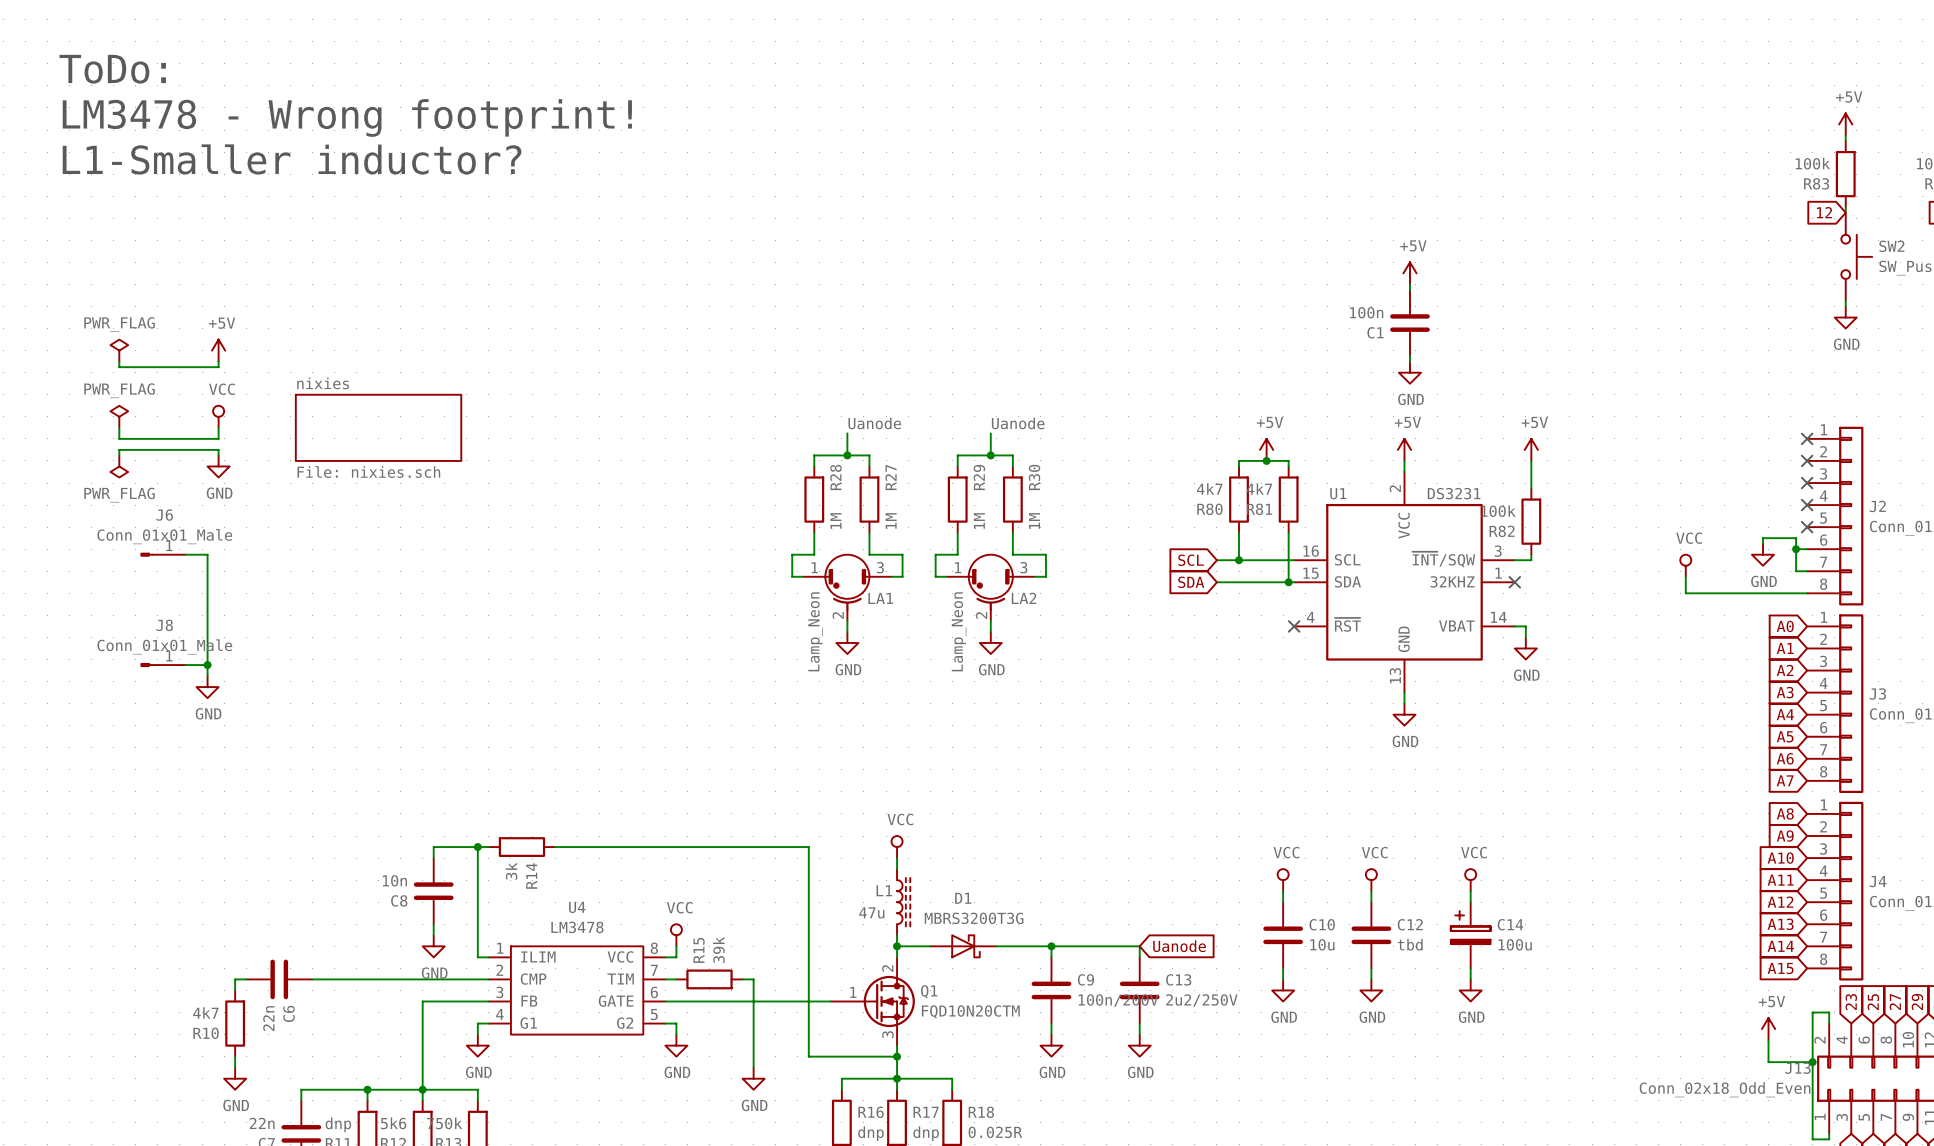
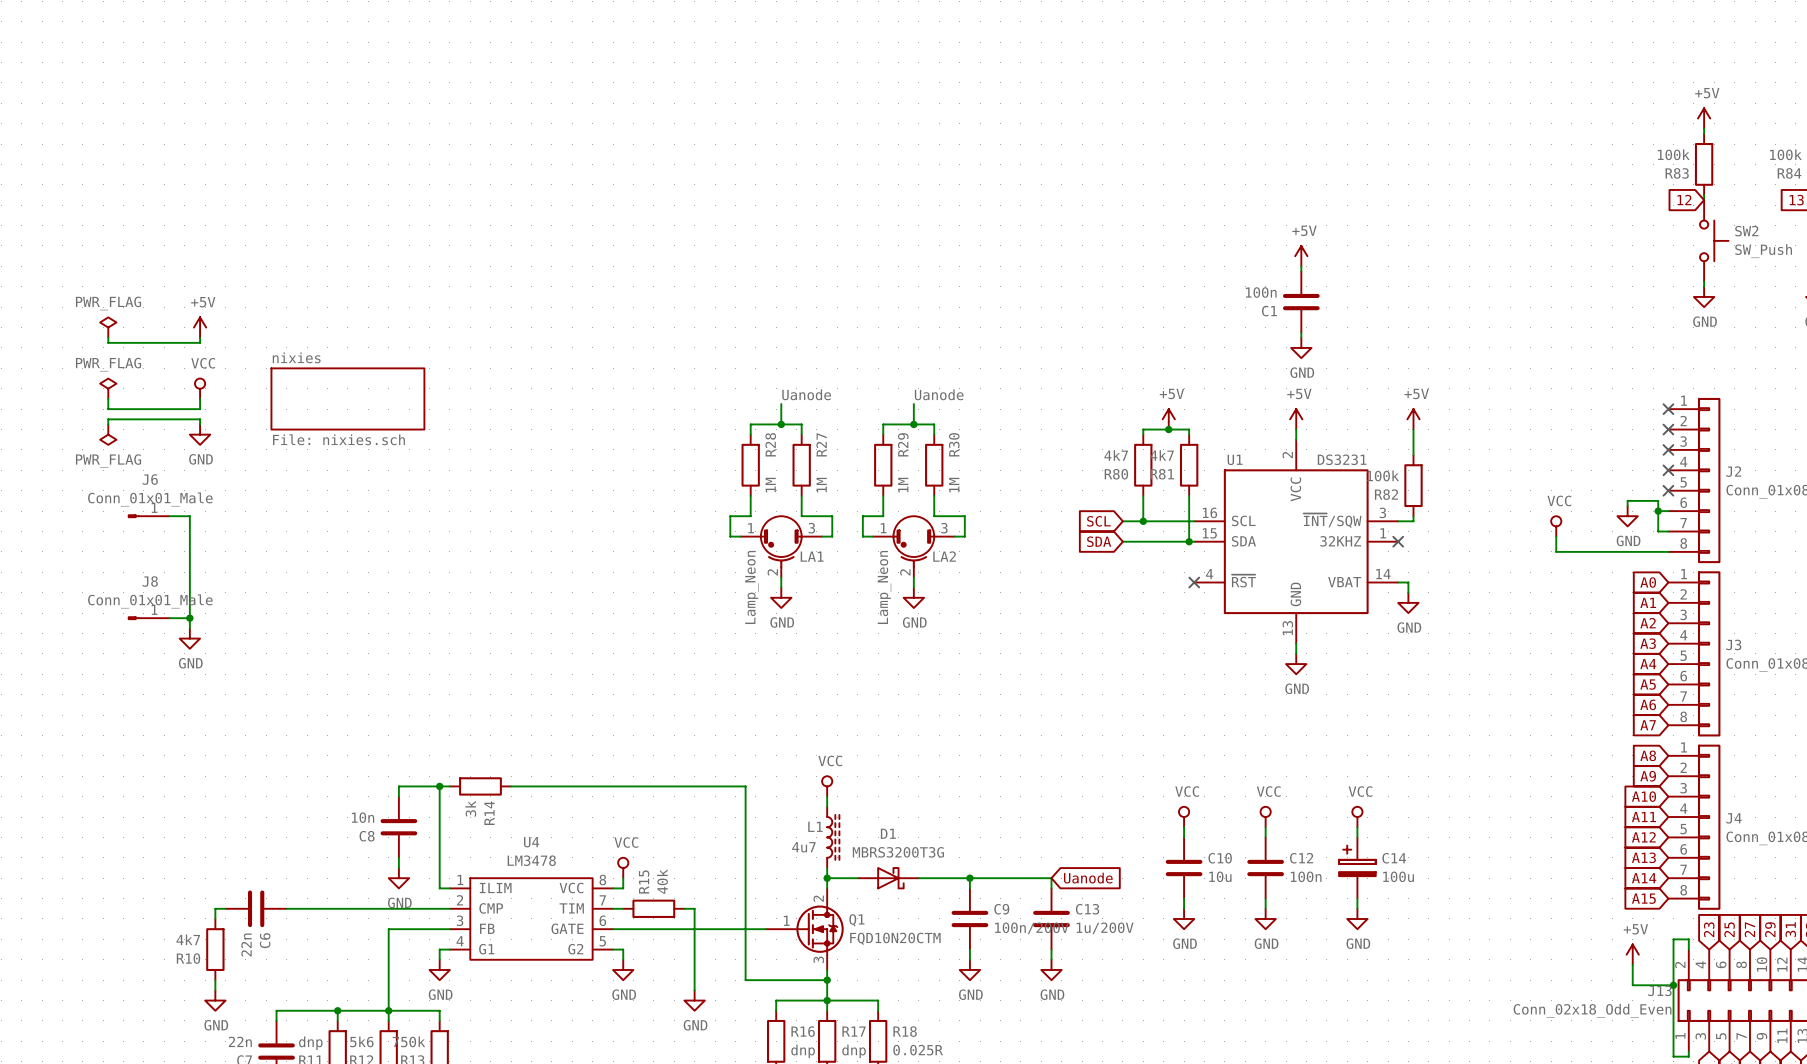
text: ToDo: (112, 69) -> none
text: LM3478 - Wrong footprint! (347, 117) -> none
text: L1-Smaller inductor? (292, 159) -> none
L1 value: 47u (871, 912) -> 4u7 (803, 847)
C12 value: tbd (1410, 944) -> 100n (1306, 876)
R15 value: 39k (718, 949) -> 40k (662, 881)
C13 value: 2u2/250V (1201, 1000) -> 1u/200V (1105, 928)

